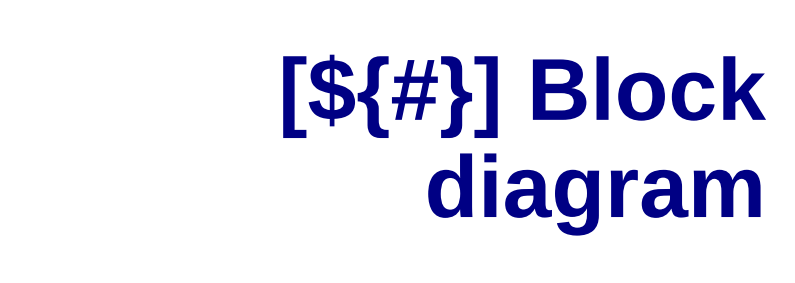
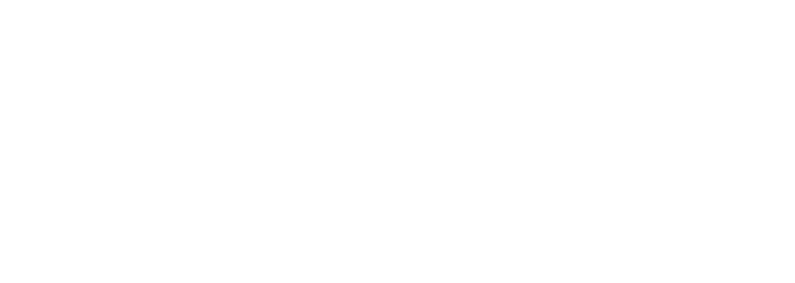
text: [${#}] Block (524, 96) -> none
text: diagram (594, 194) -> none

